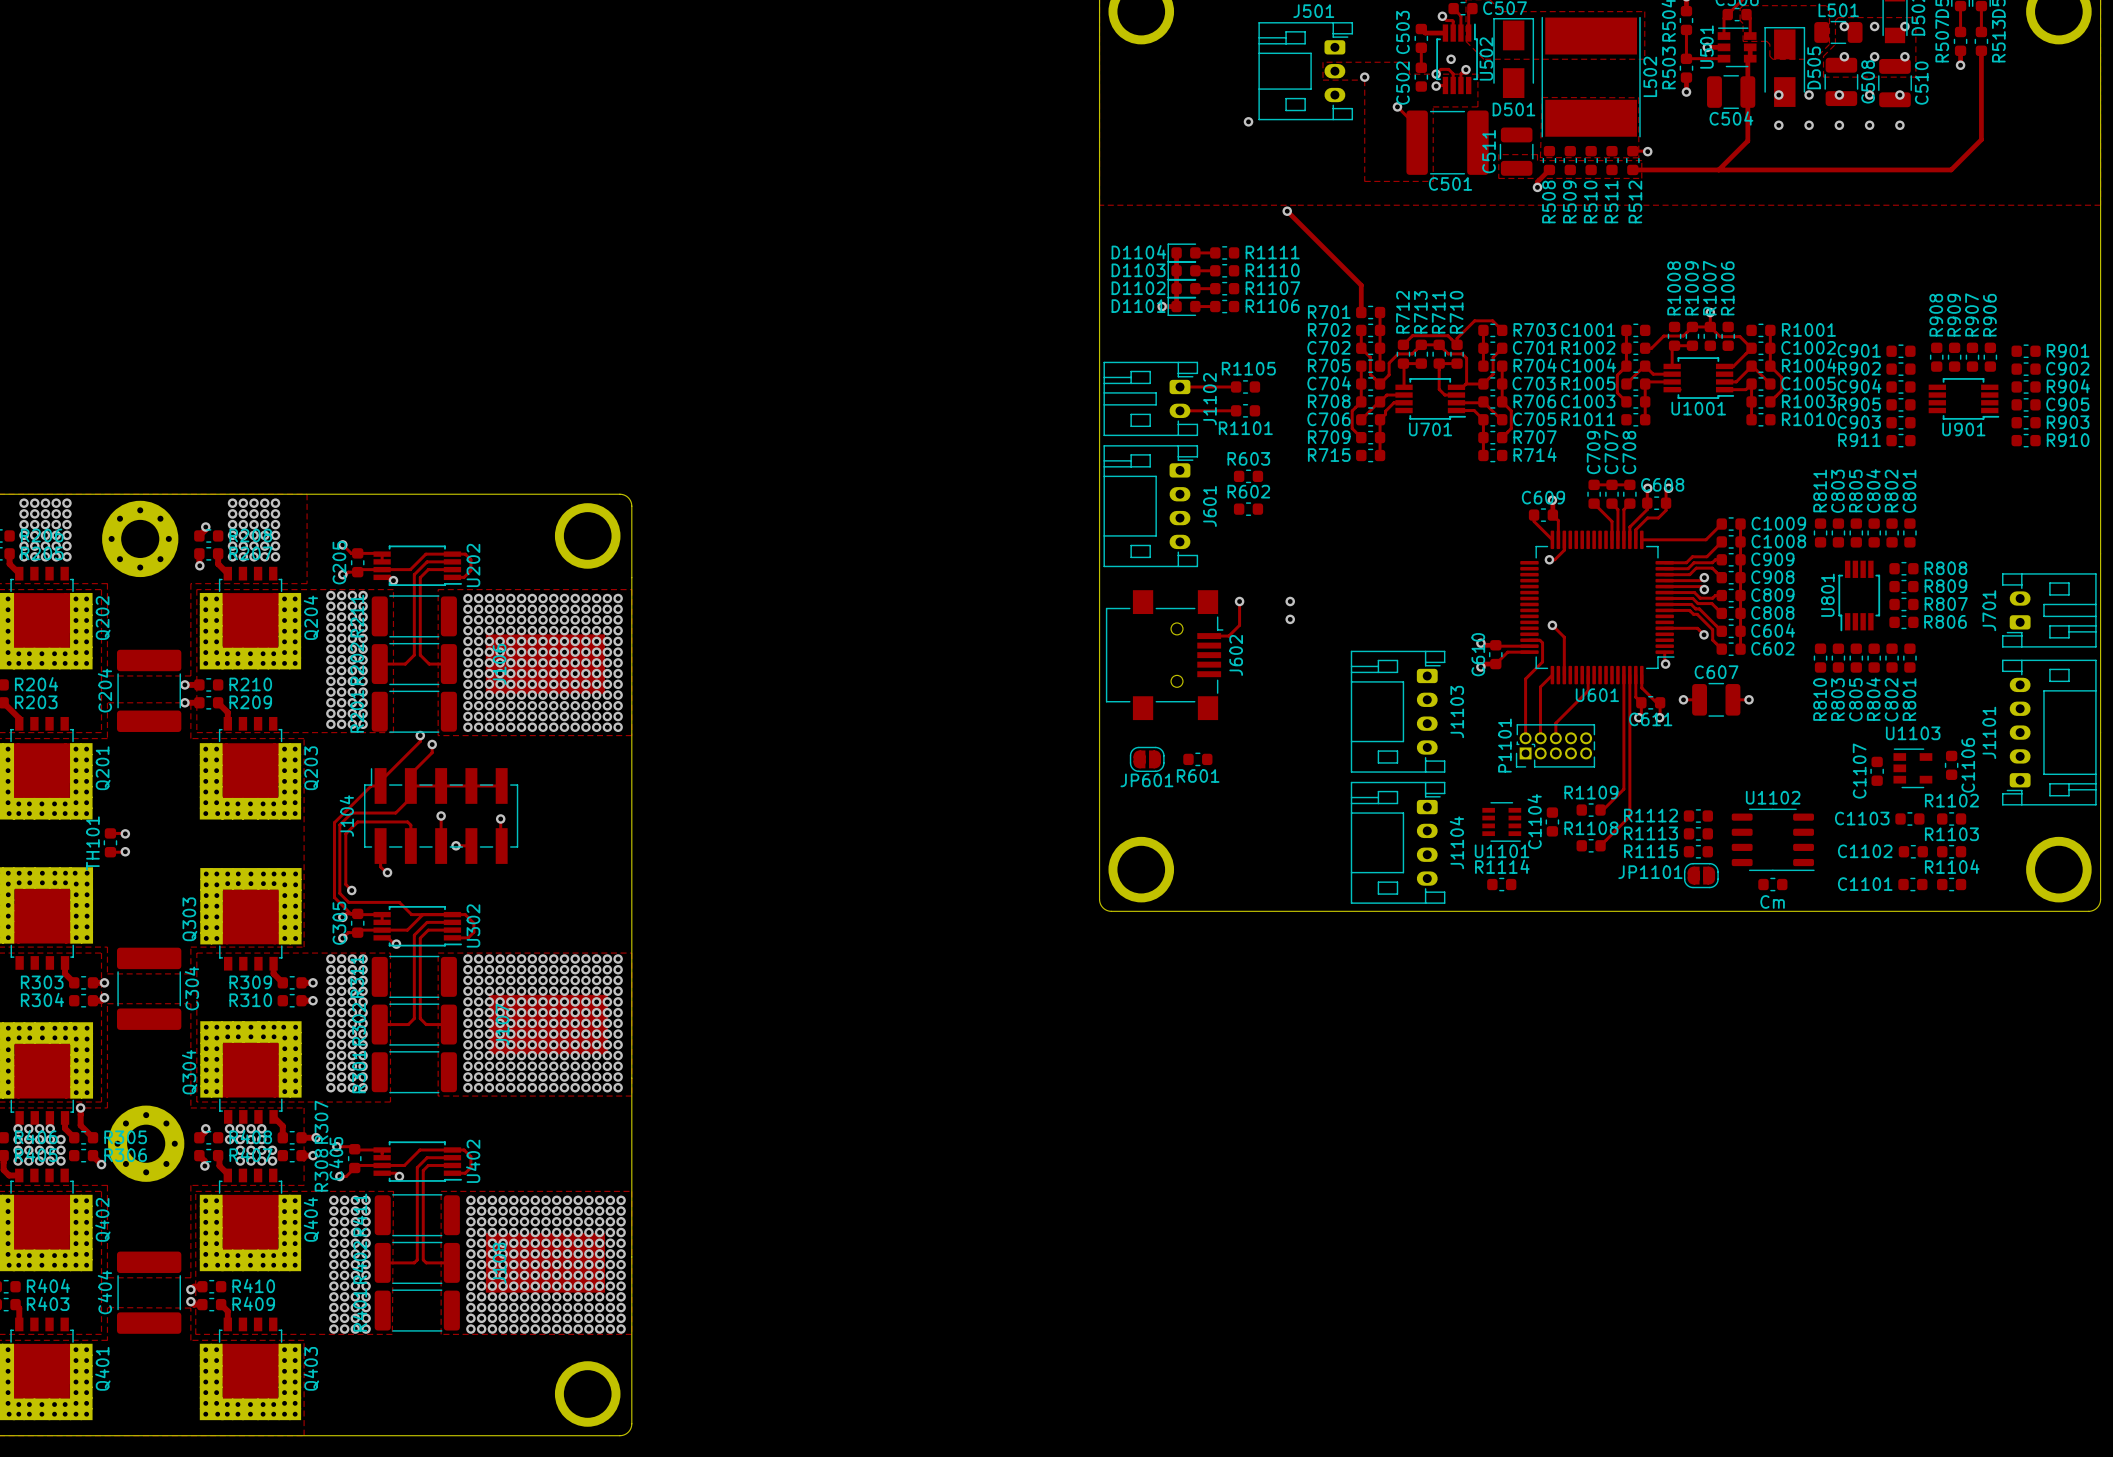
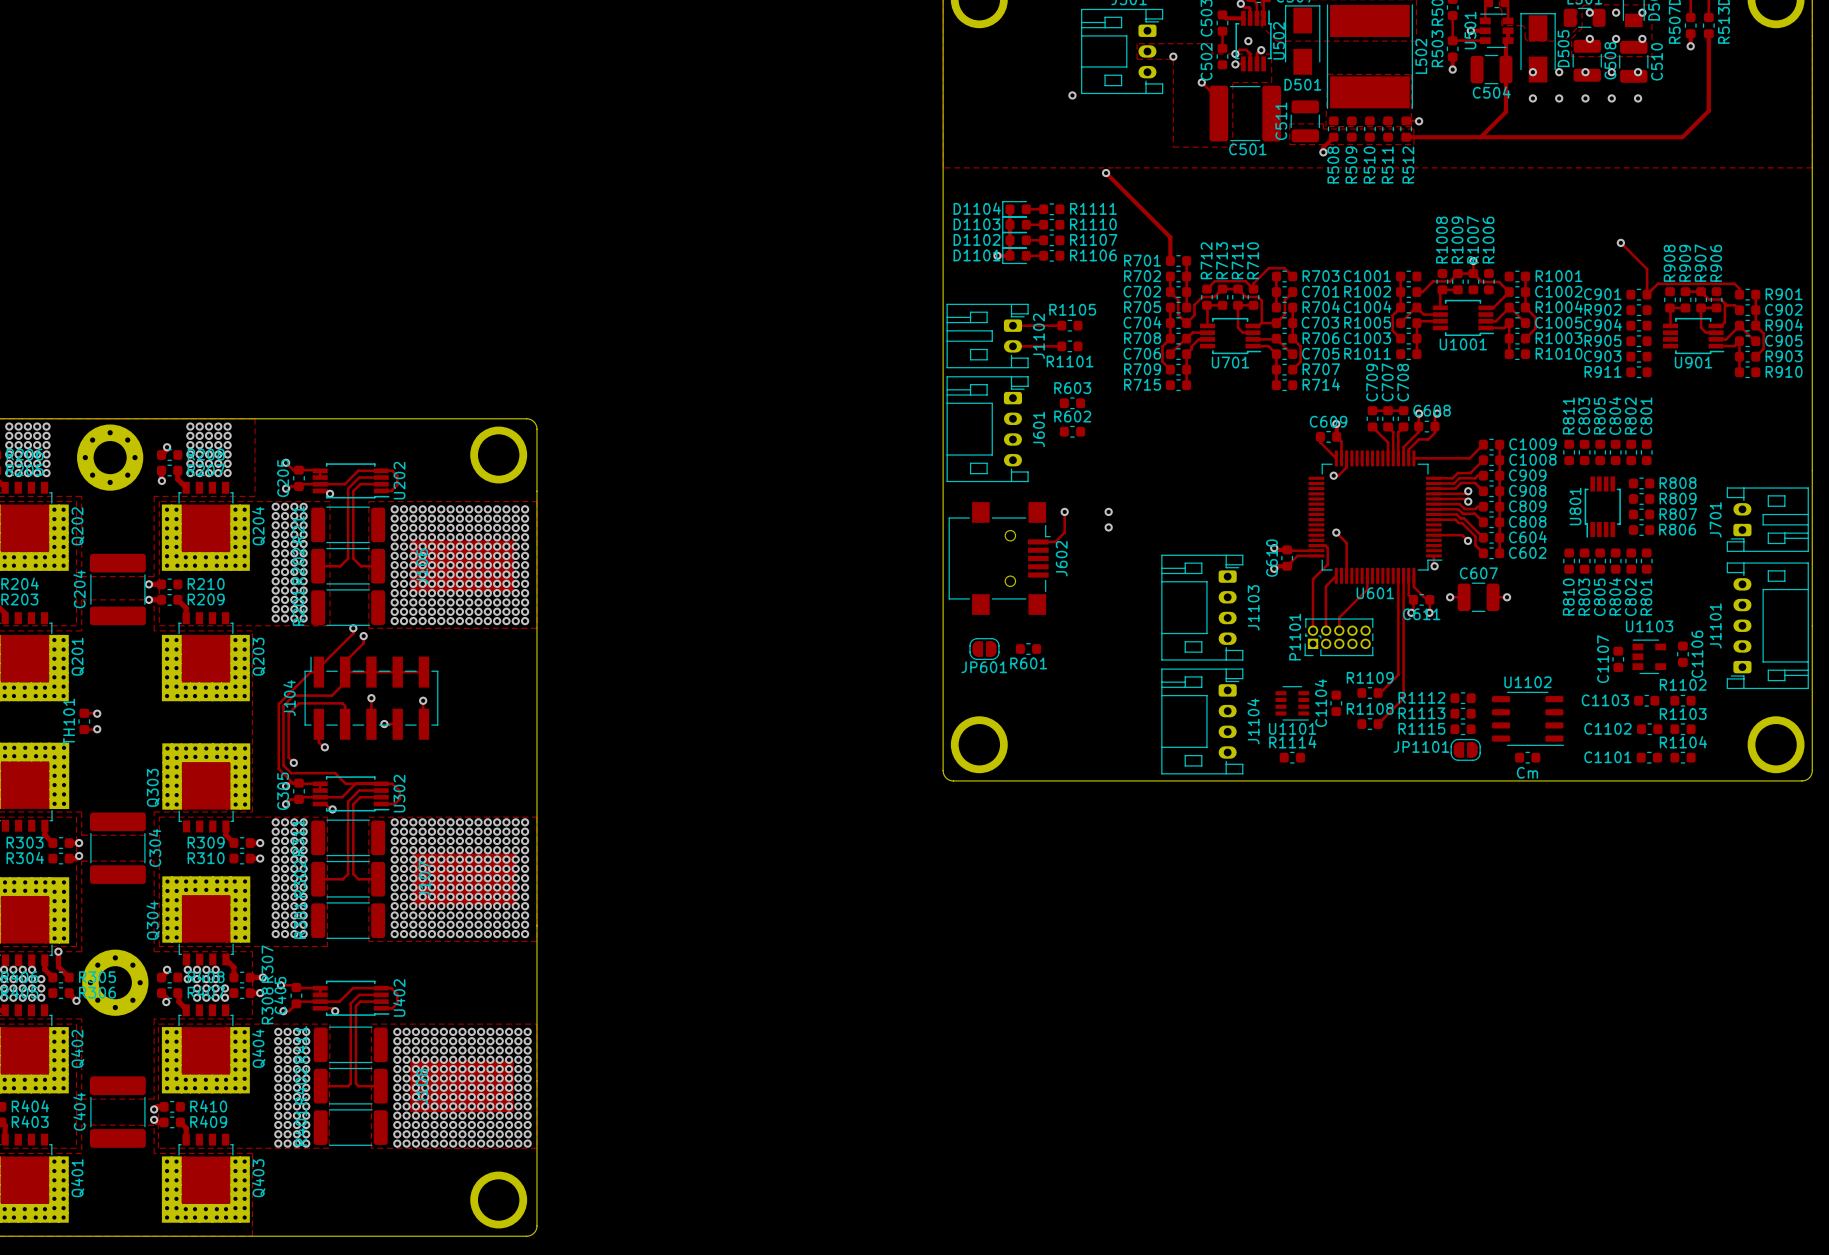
track: none -> (1620, 242) (1647, 269) (1647, 294) (1657, 283) (1734, 283) (1739, 288) (1739, 294)
via: none -> (1620, 242)
track: none -> (1685, 291) (1701, 291) (1708, 299) (1721, 299) (1726, 305) (1734, 305) (1739, 310)
track: none -> (1755, 294) (1755, 325) (1763, 333) (1763, 348) (1755, 356)
track: none -> (1724, 303) (1724, 322) (1721, 325) (1716, 325)
track: none -> (1685, 307) (1670, 307) (1670, 325)
track: none -> (1716, 307) (1701, 307) (1701, 327) (1705, 332) (1716, 332)
track: none -> (1716, 339) (1726, 339) (1739, 325) (1755, 341)
track: none -> (1716, 346) (1734, 346) (1739, 341) (1739, 372)

